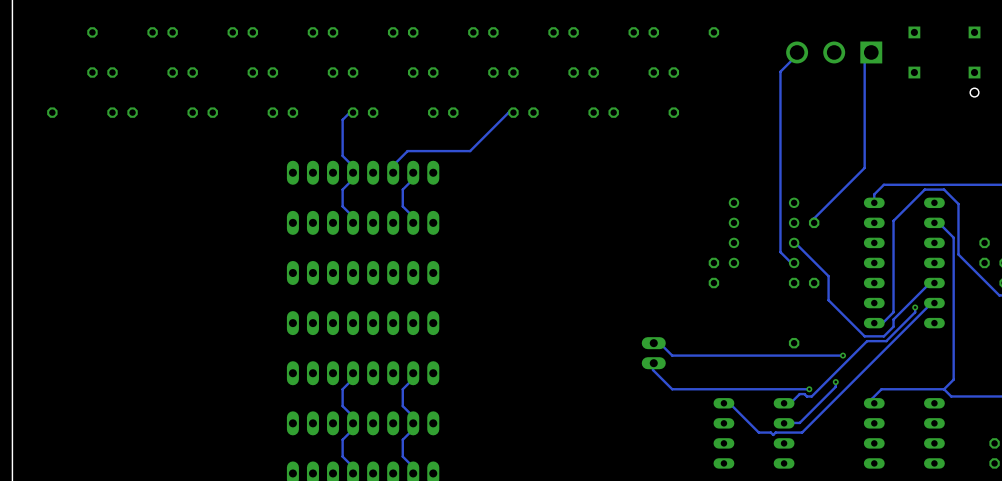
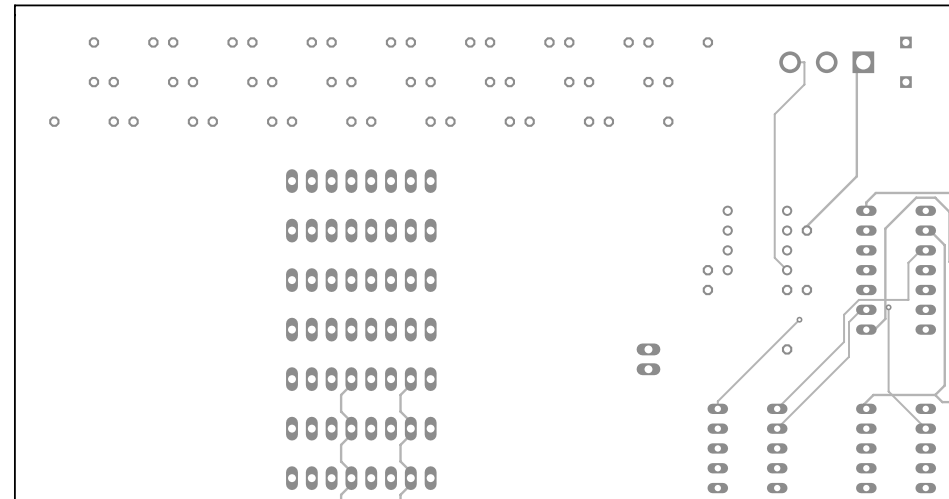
track: (797, 52) (794, 52) (794, 57) (780, 71) (780, 252) (790, 261) (794, 262) -> (799, 62) (804, 62) (804, 84) (774, 114) (774, 257) (787, 270)
track: (353, 112) (349, 112) (342, 119) (342, 155) (352, 165) (352, 179) (342, 189) (342, 206) (352, 216) (353, 222) -> none
track: (513, 112) (508, 112) (470, 151) (407, 151) (393, 165) (393, 172) -> none
track: (413, 172) (412, 179) (402, 189) (402, 206) (412, 216) (413, 222) -> none
track: (794, 242) (828, 276) (828, 300) (864, 336) (883, 336) (893, 326) (893, 319) (929, 283) (934, 283) -> none
track: none -> (888, 307) (888, 391) (925, 428)
track: (934, 303) (934, 305) (929, 305) (802, 432) (775, 432) (773, 434) (770, 432) (758, 432) (729, 403) (723, 403) -> (799, 319) (717, 401) (717, 408)
track: (915, 307) (915, 312) (886, 341) (867, 341) (811, 396) (799, 394) (792, 401) (785, 401) (784, 403) -> (925, 250) (920, 250) (908, 262) (908, 299) (858, 299) (844, 314) (844, 342) (777, 408)
via position: (915, 307) -> (888, 307)
via: none -> (799, 319)
track: (653, 343) (660, 343) (672, 355) (843, 355) -> none
via: (843, 355) -> none
track: (653, 363) (652, 370) (672, 389) (809, 389) -> none
track: (835, 382) (835, 386) (799, 422) (784, 423) -> (866, 309) (861, 309) (849, 322) (849, 356) (777, 428)
via: (835, 382) -> none
via: (809, 389) -> none

